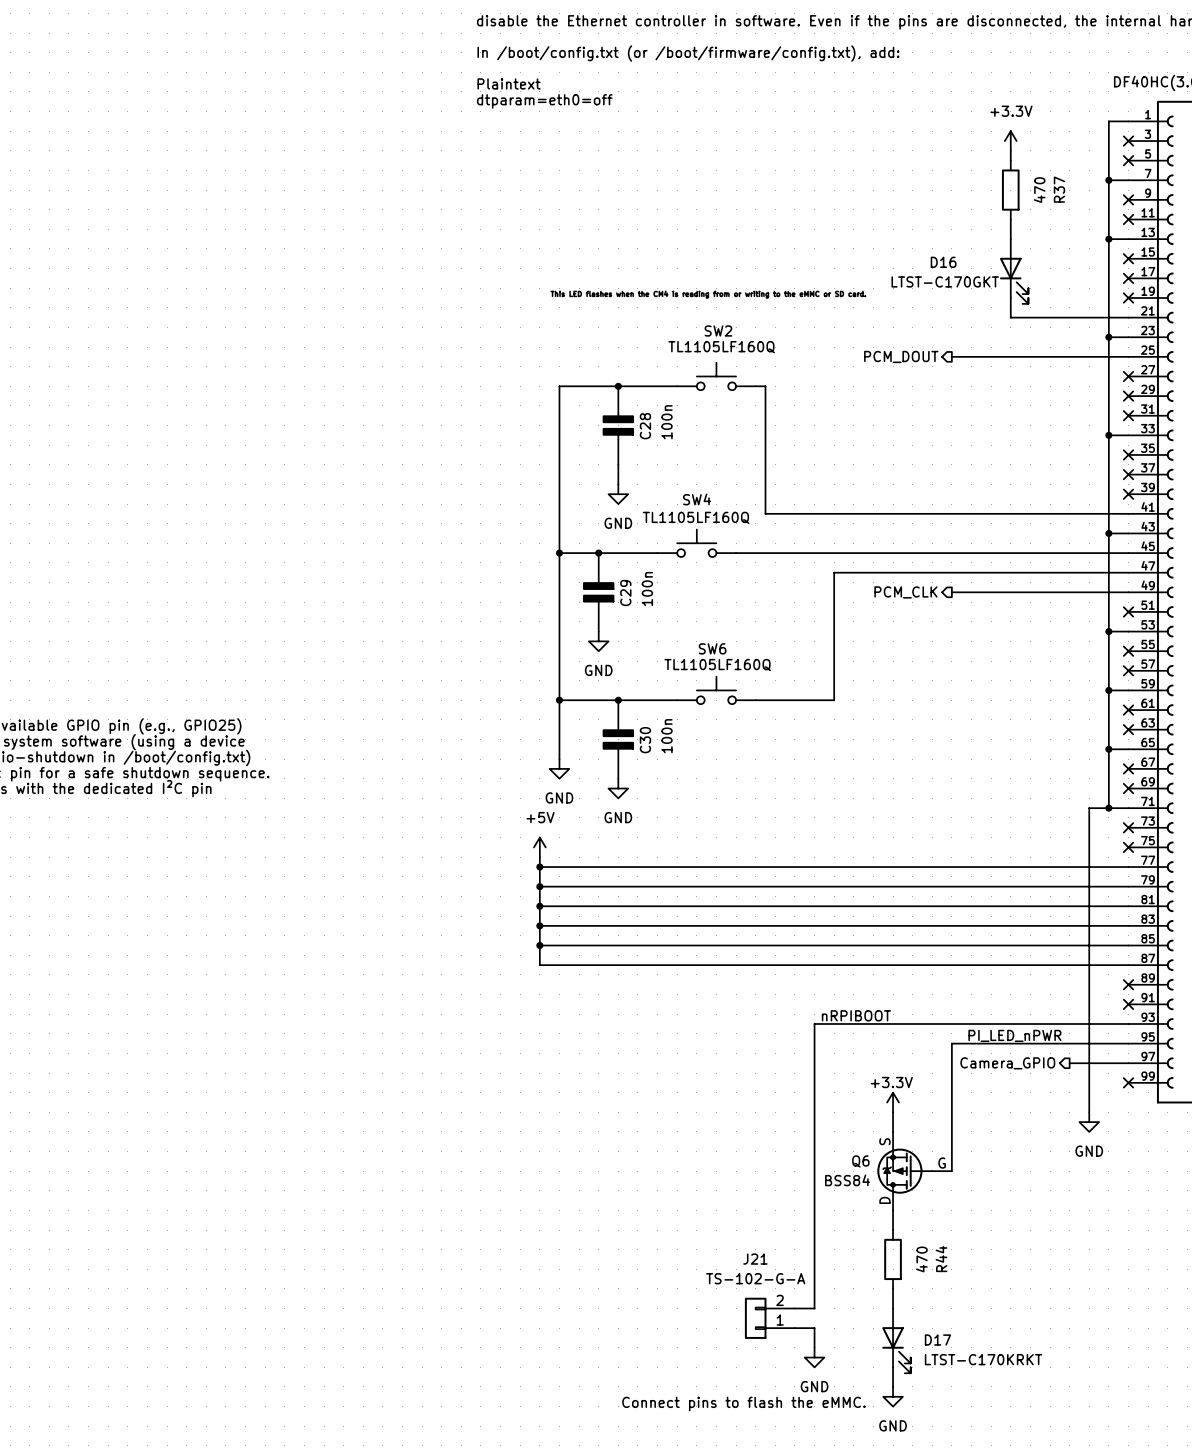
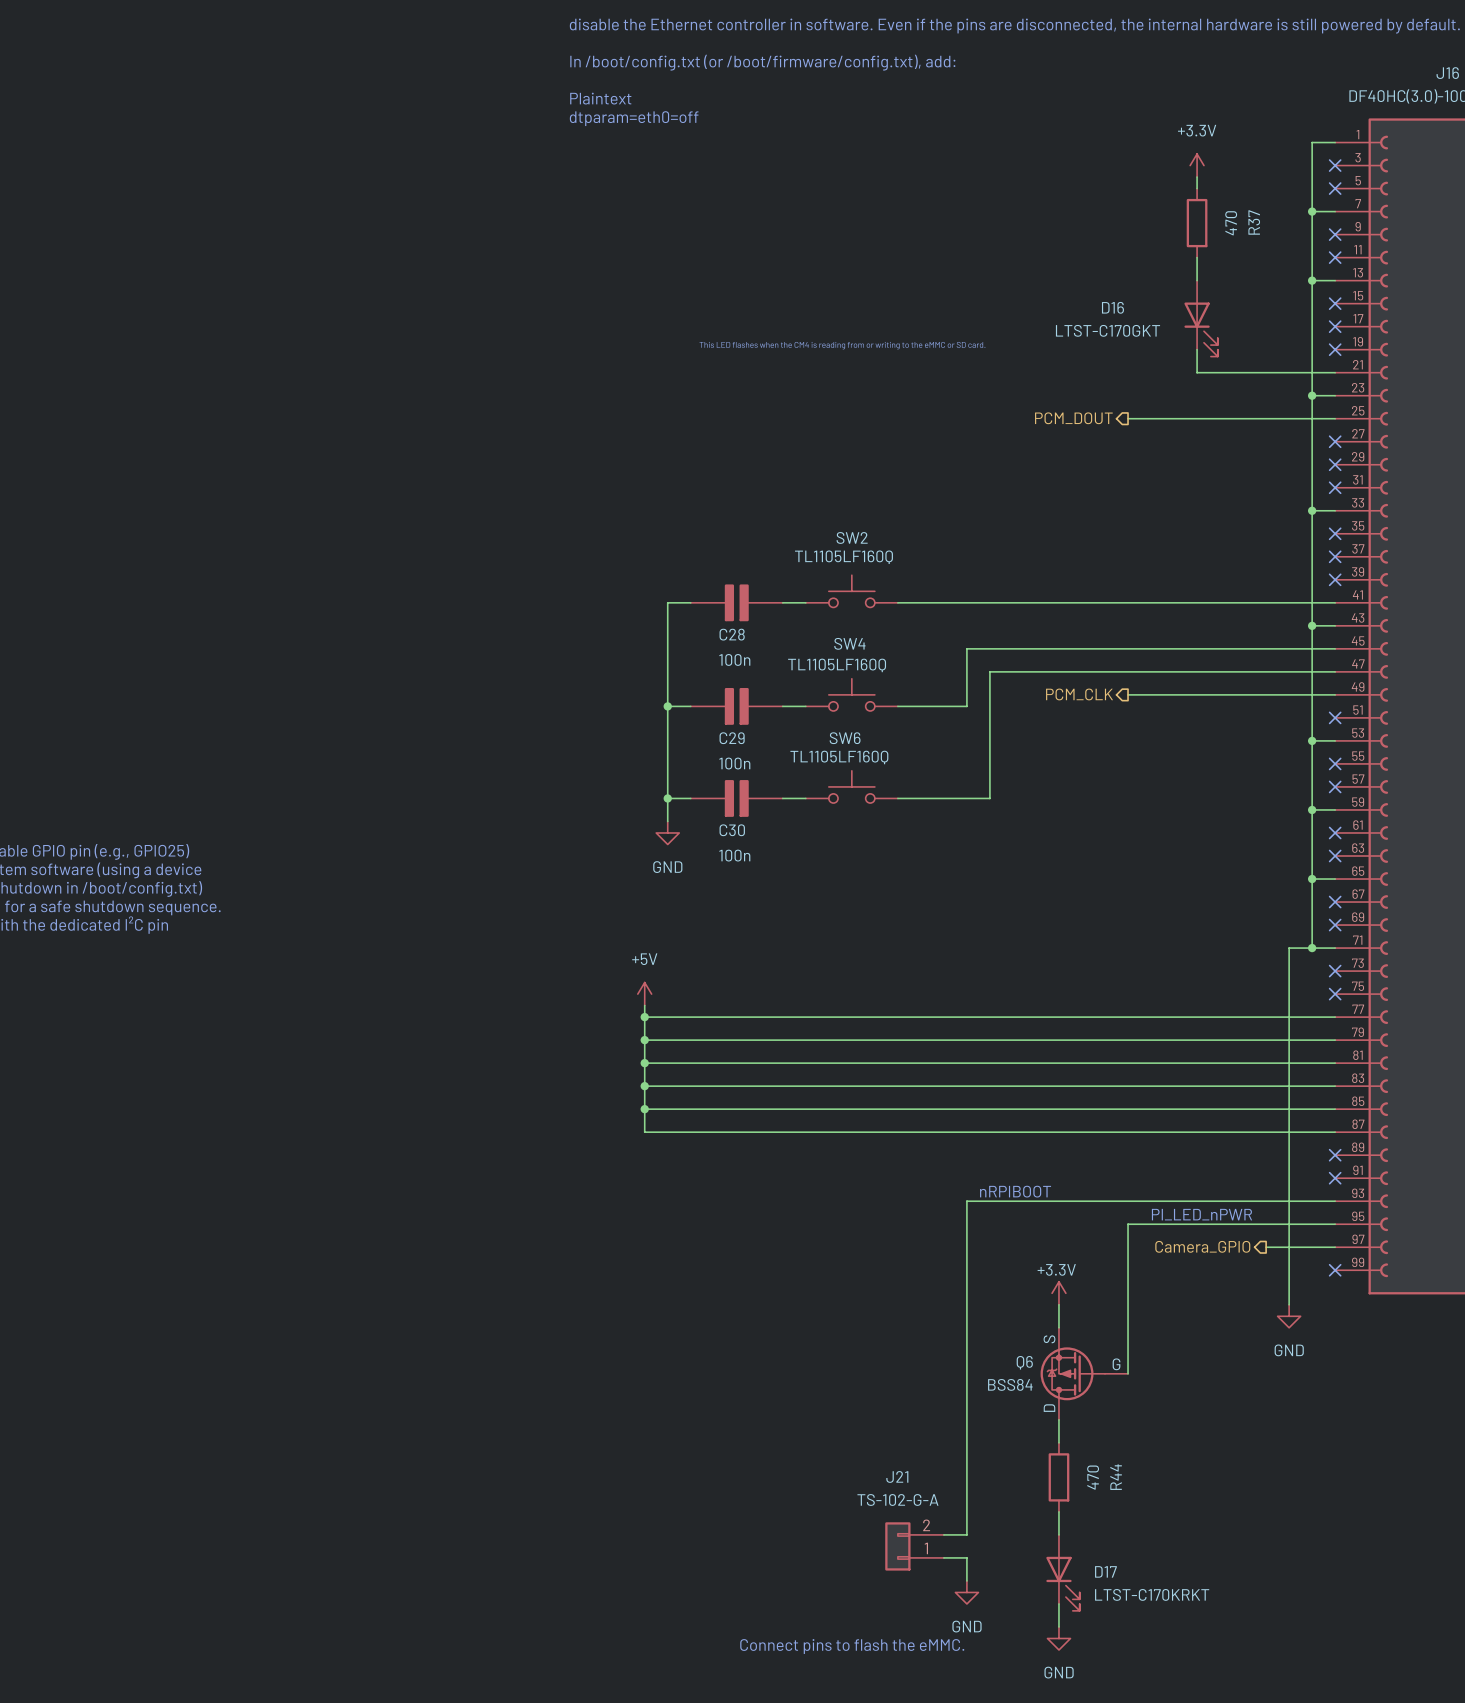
SW2 position: (716, 376) -> (851, 591)
junction: (618, 386) -> none
wire: (677, 386) (559, 386) (559, 513) -> (690, 602) (667, 602)
wire: (755, 386) (765, 386) (765, 513) -> (897, 602) (909, 602)
C28 rotation: 0° (618, 425) -> 90° clockwise (736, 602)
C28 position: (618, 425) -> (736, 602)
wire: (618, 464) (618, 484) -> none
power symbol: GND (618, 494) -> none
wire: none -> (782, 602) (805, 602)
SW4 position: (696, 543) -> (851, 694)
wire: (559, 553) (657, 553) -> none
junction: (559, 553) -> none
junction: (598, 553) -> none
wire: (736, 553) (814, 553) -> (897, 706) (966, 706) (966, 648)
C29 rotation: 0° (598, 592) -> 90° clockwise (736, 706)
wire: none -> (667, 706) (690, 706)
junction: none -> (667, 706)
wire: none -> (782, 706) (805, 706)
power symbol: GND (598, 641) -> none
wire: none -> (667, 798) (690, 798)
wire: none -> (782, 798) (805, 798)
wire: (834, 680) (834, 700) (755, 700) -> (989, 798) (897, 798)
SW6 position: (716, 690) -> (851, 786)
junction position: (559, 700) -> (667, 798)
junction: (618, 700) -> none
wire: (677, 700) (559, 700) (559, 759) -> none
power symbol: none -> GND (667, 832)
C30 rotation: 0° (618, 739) -> 90° clockwise (736, 798)
C30 position: (618, 739) -> (736, 798)
power symbol: GND (559, 768) -> none
power symbol: GND (618, 788) -> none

